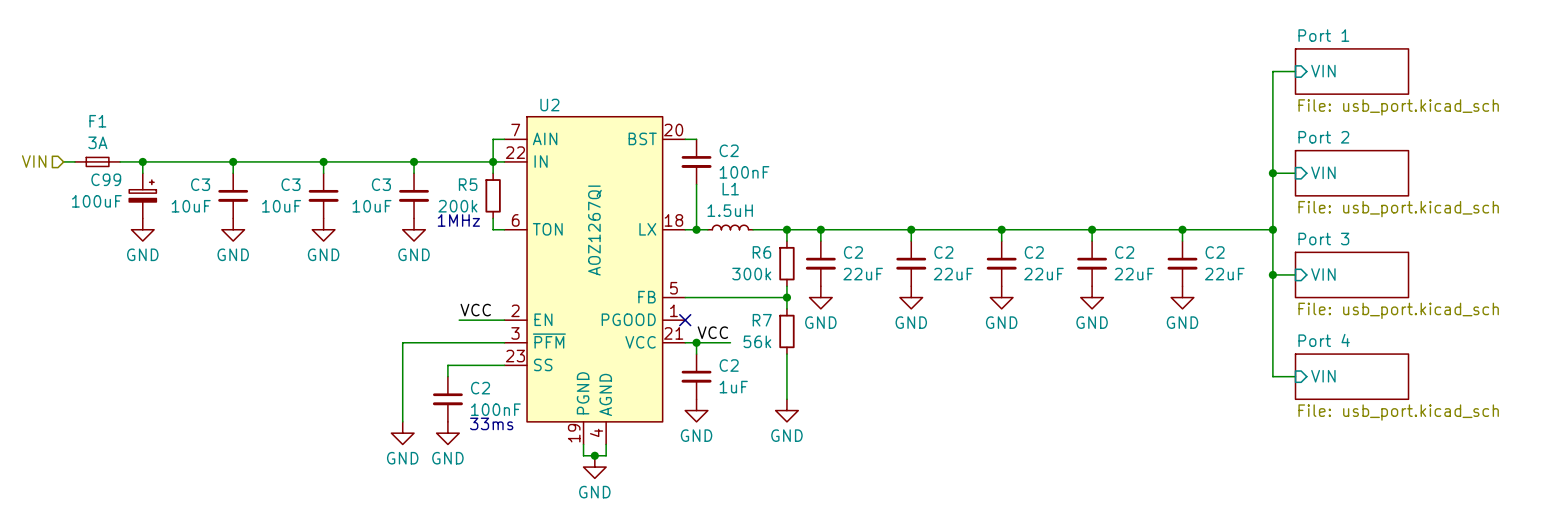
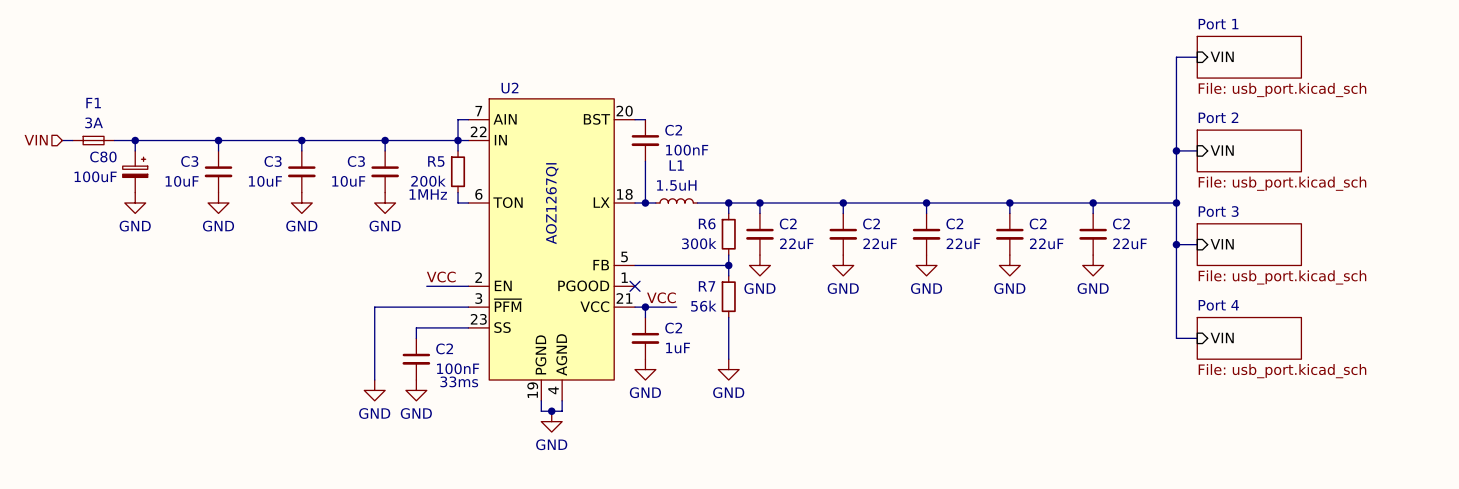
C99 name: C99 (106, 179) -> C80 (103, 156)

